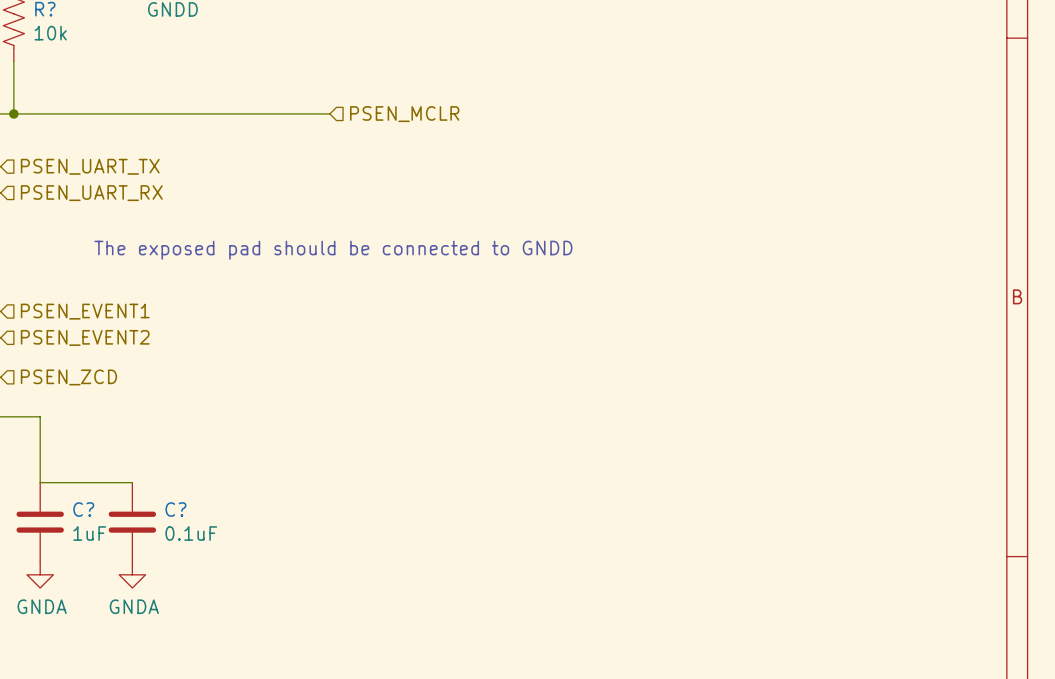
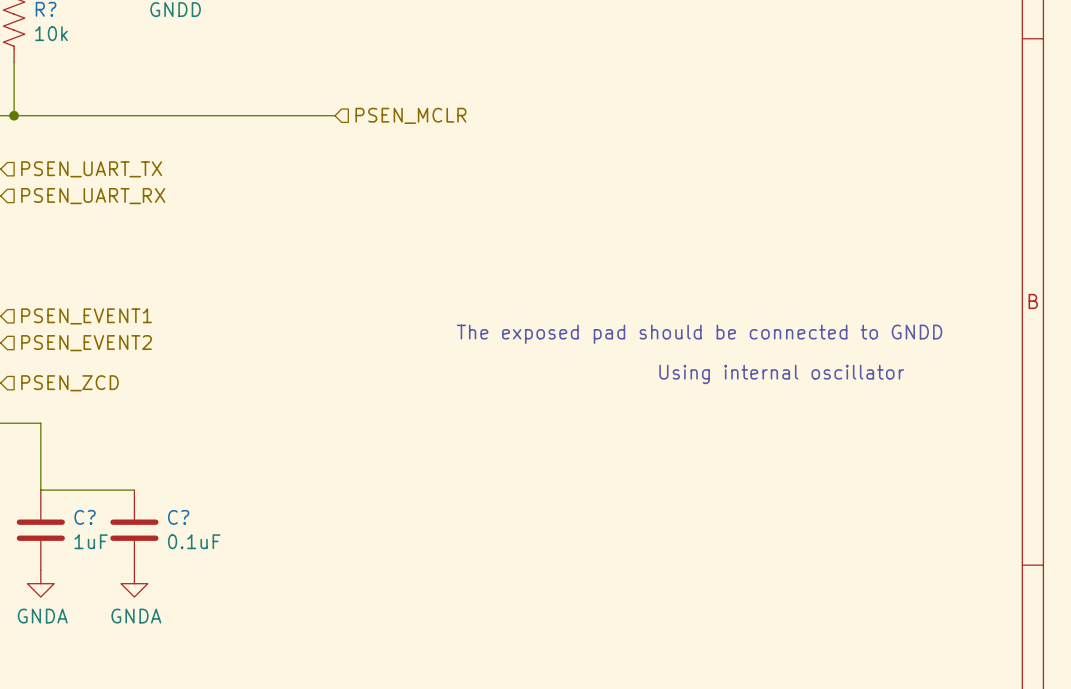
text: The exposed pad should be connected to GNDD (333, 250) -> none
text: none -> The exposed pad should be connected to GNDD (699, 334)
text: none -> Using internal oscillator (781, 374)

